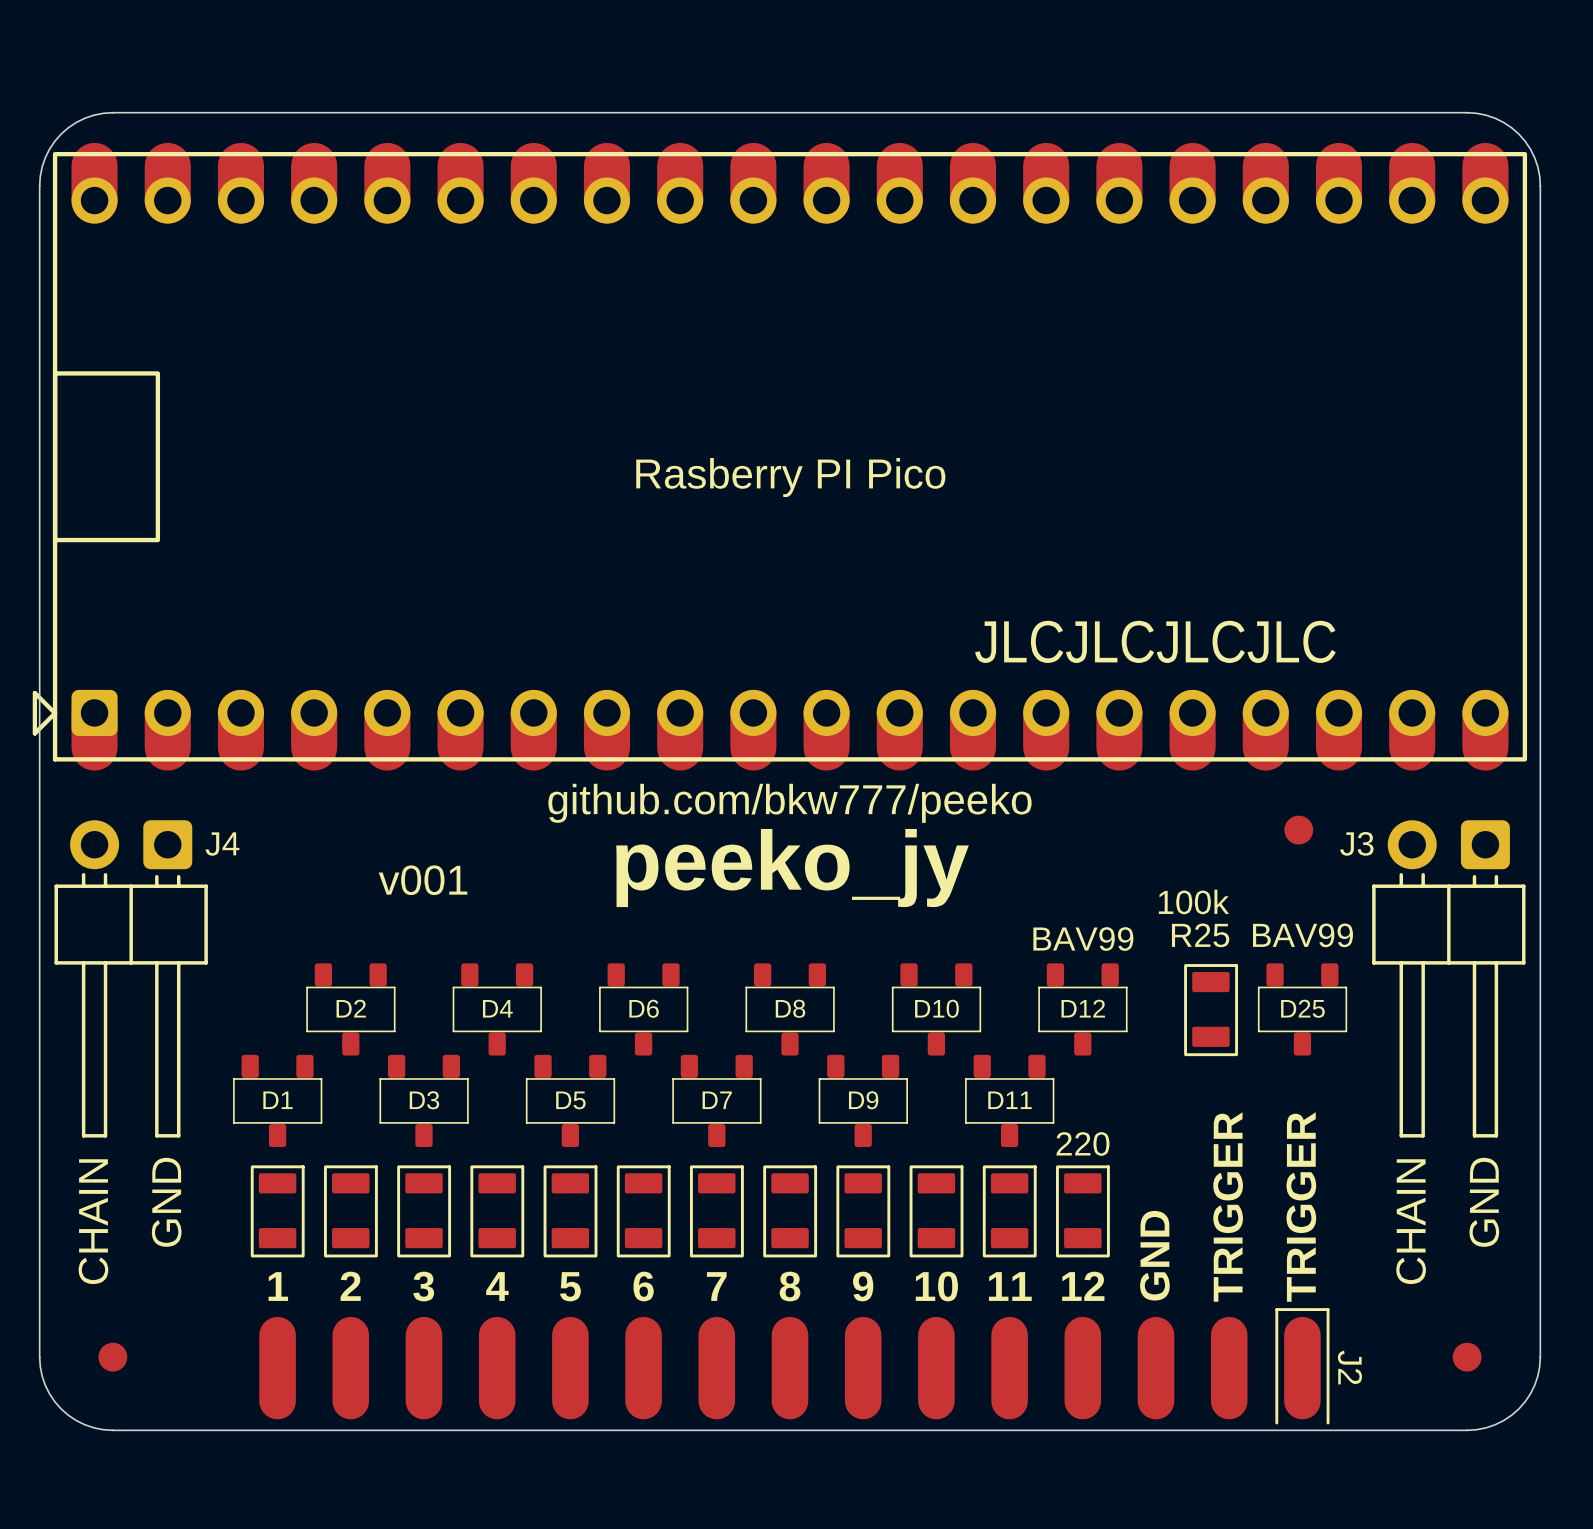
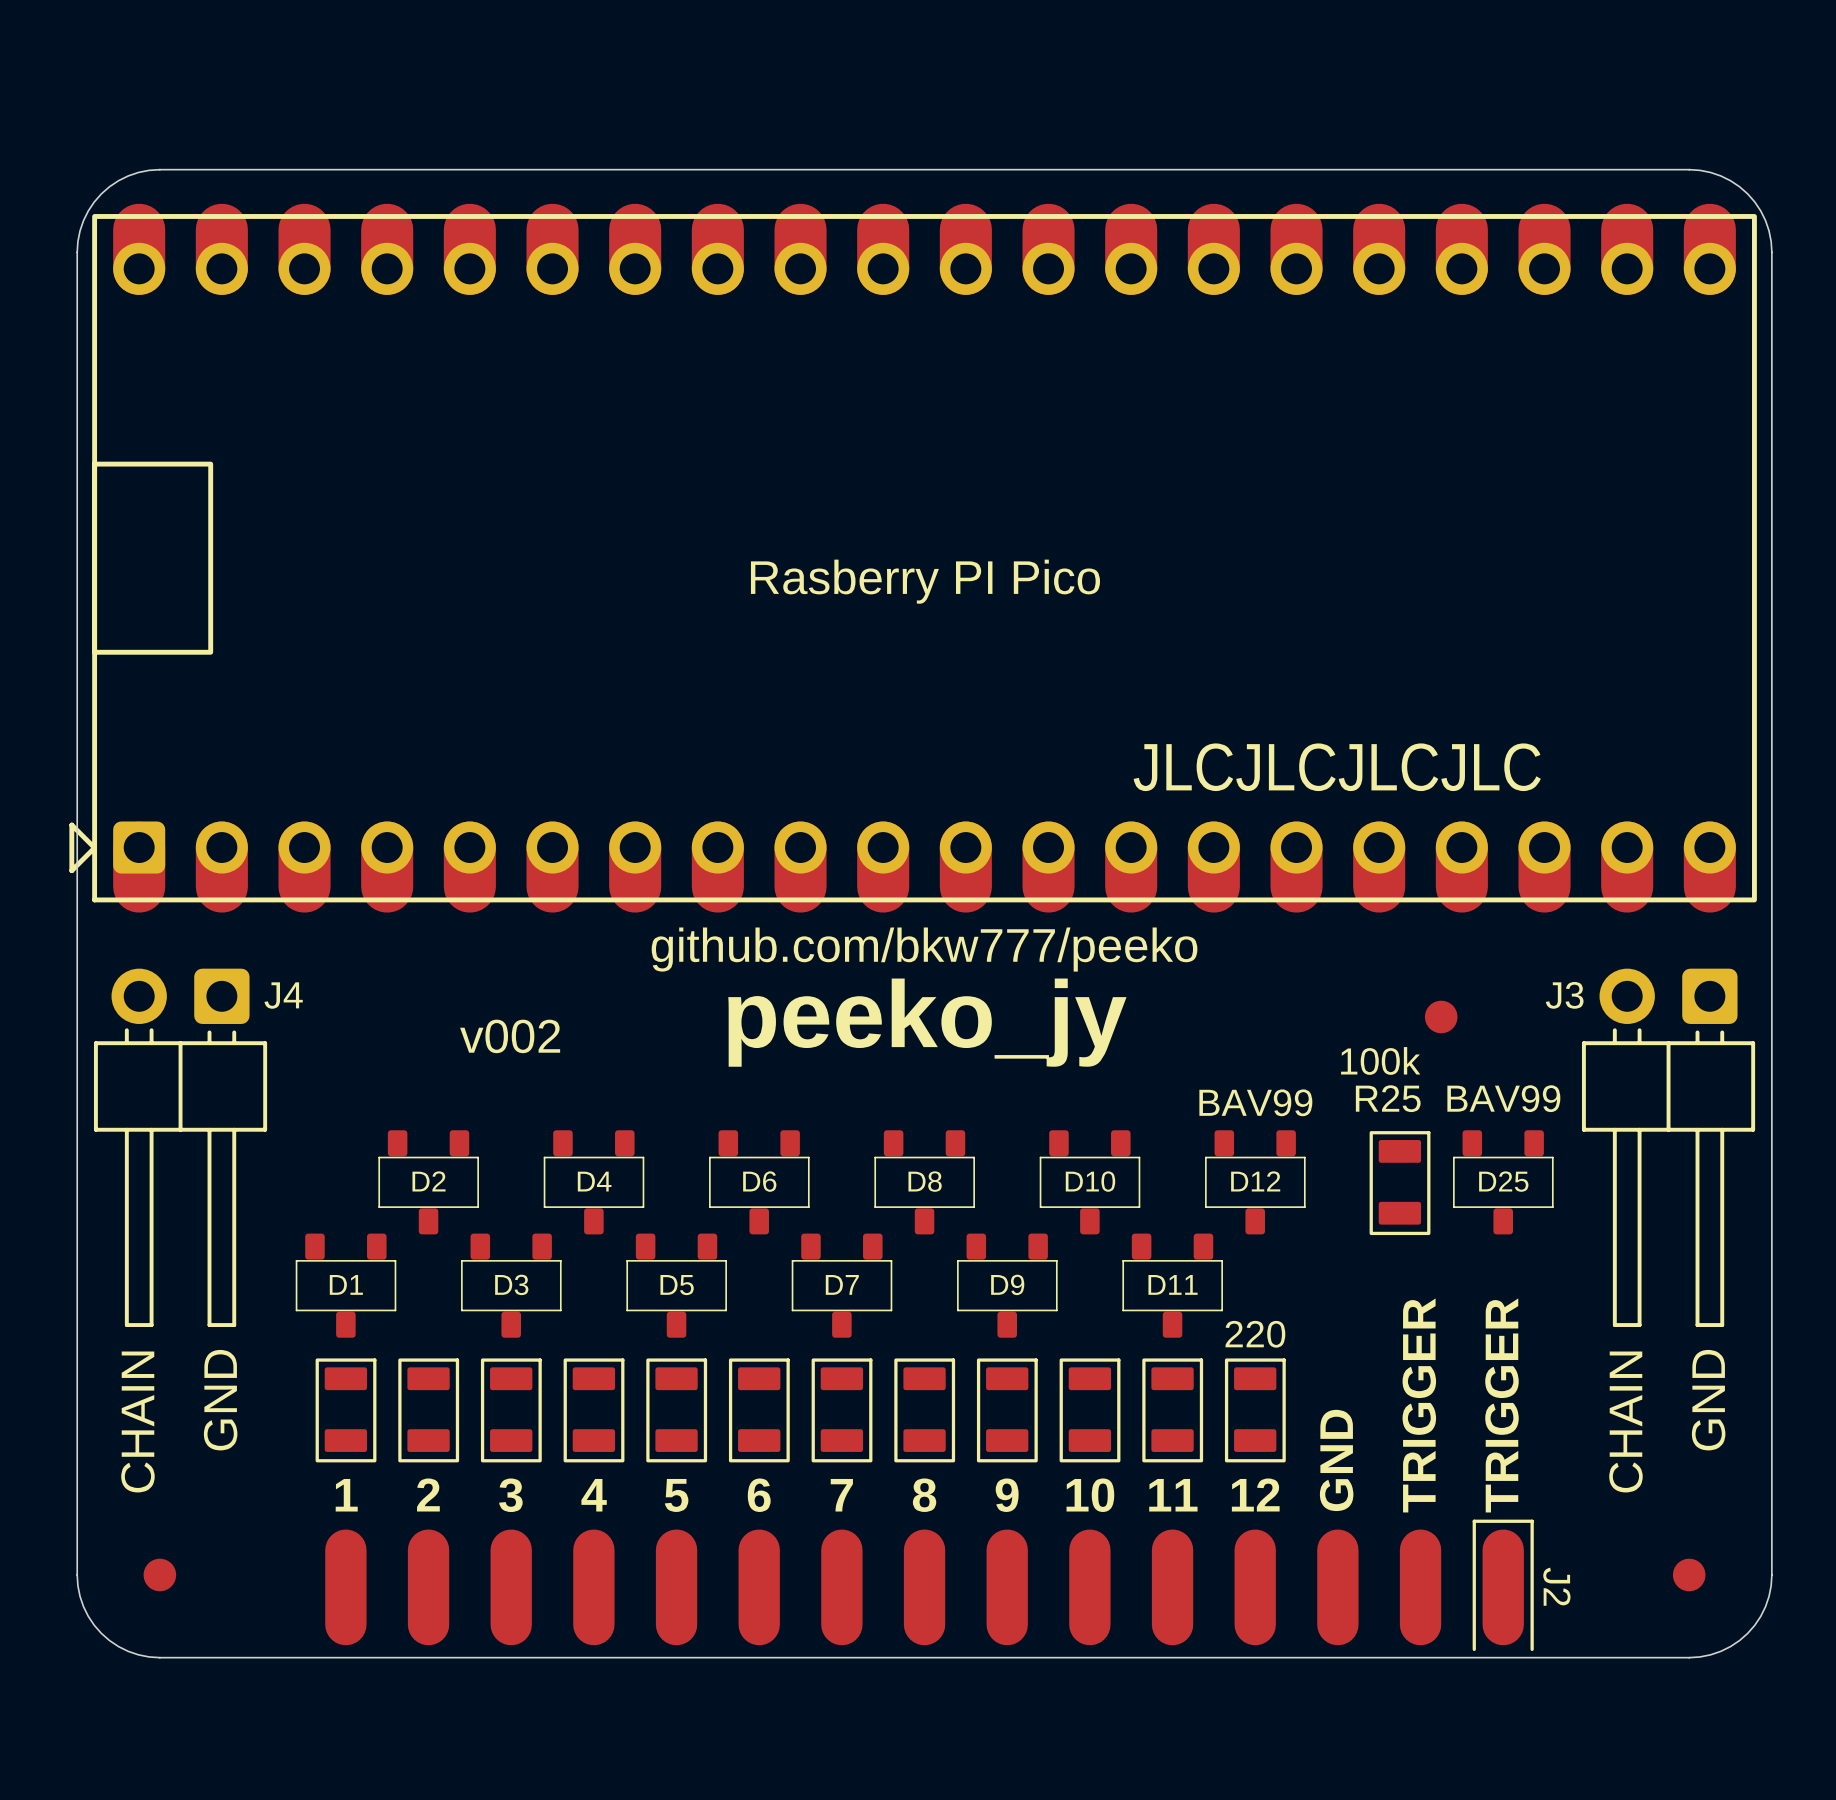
part position: (1298, 830) -> (1441, 1016)
text: v001 (423, 880) -> v002 (510, 1036)

